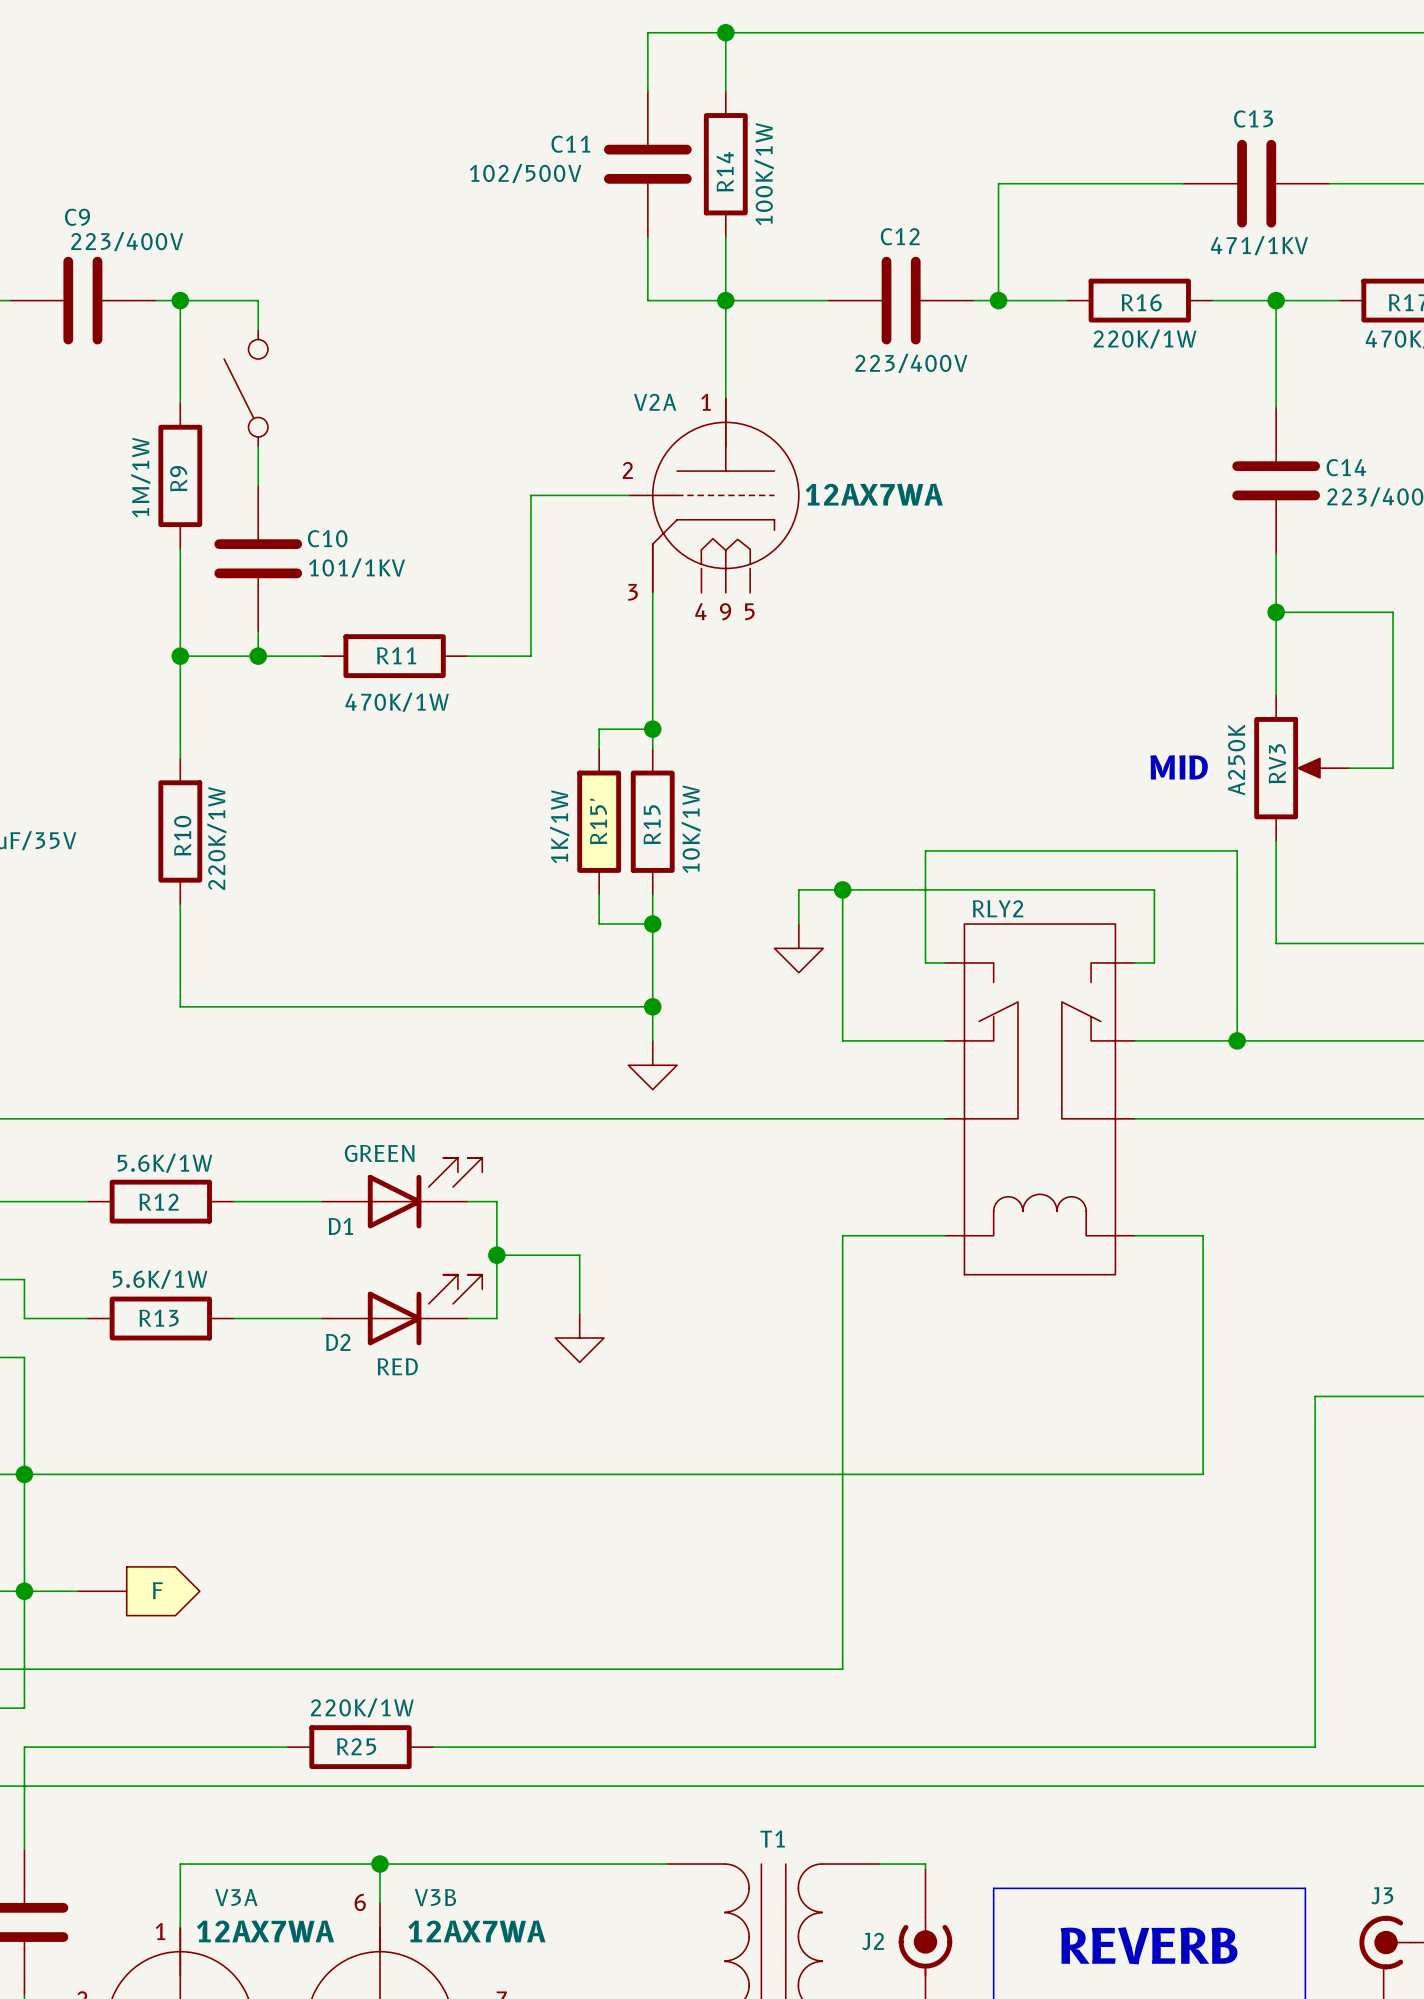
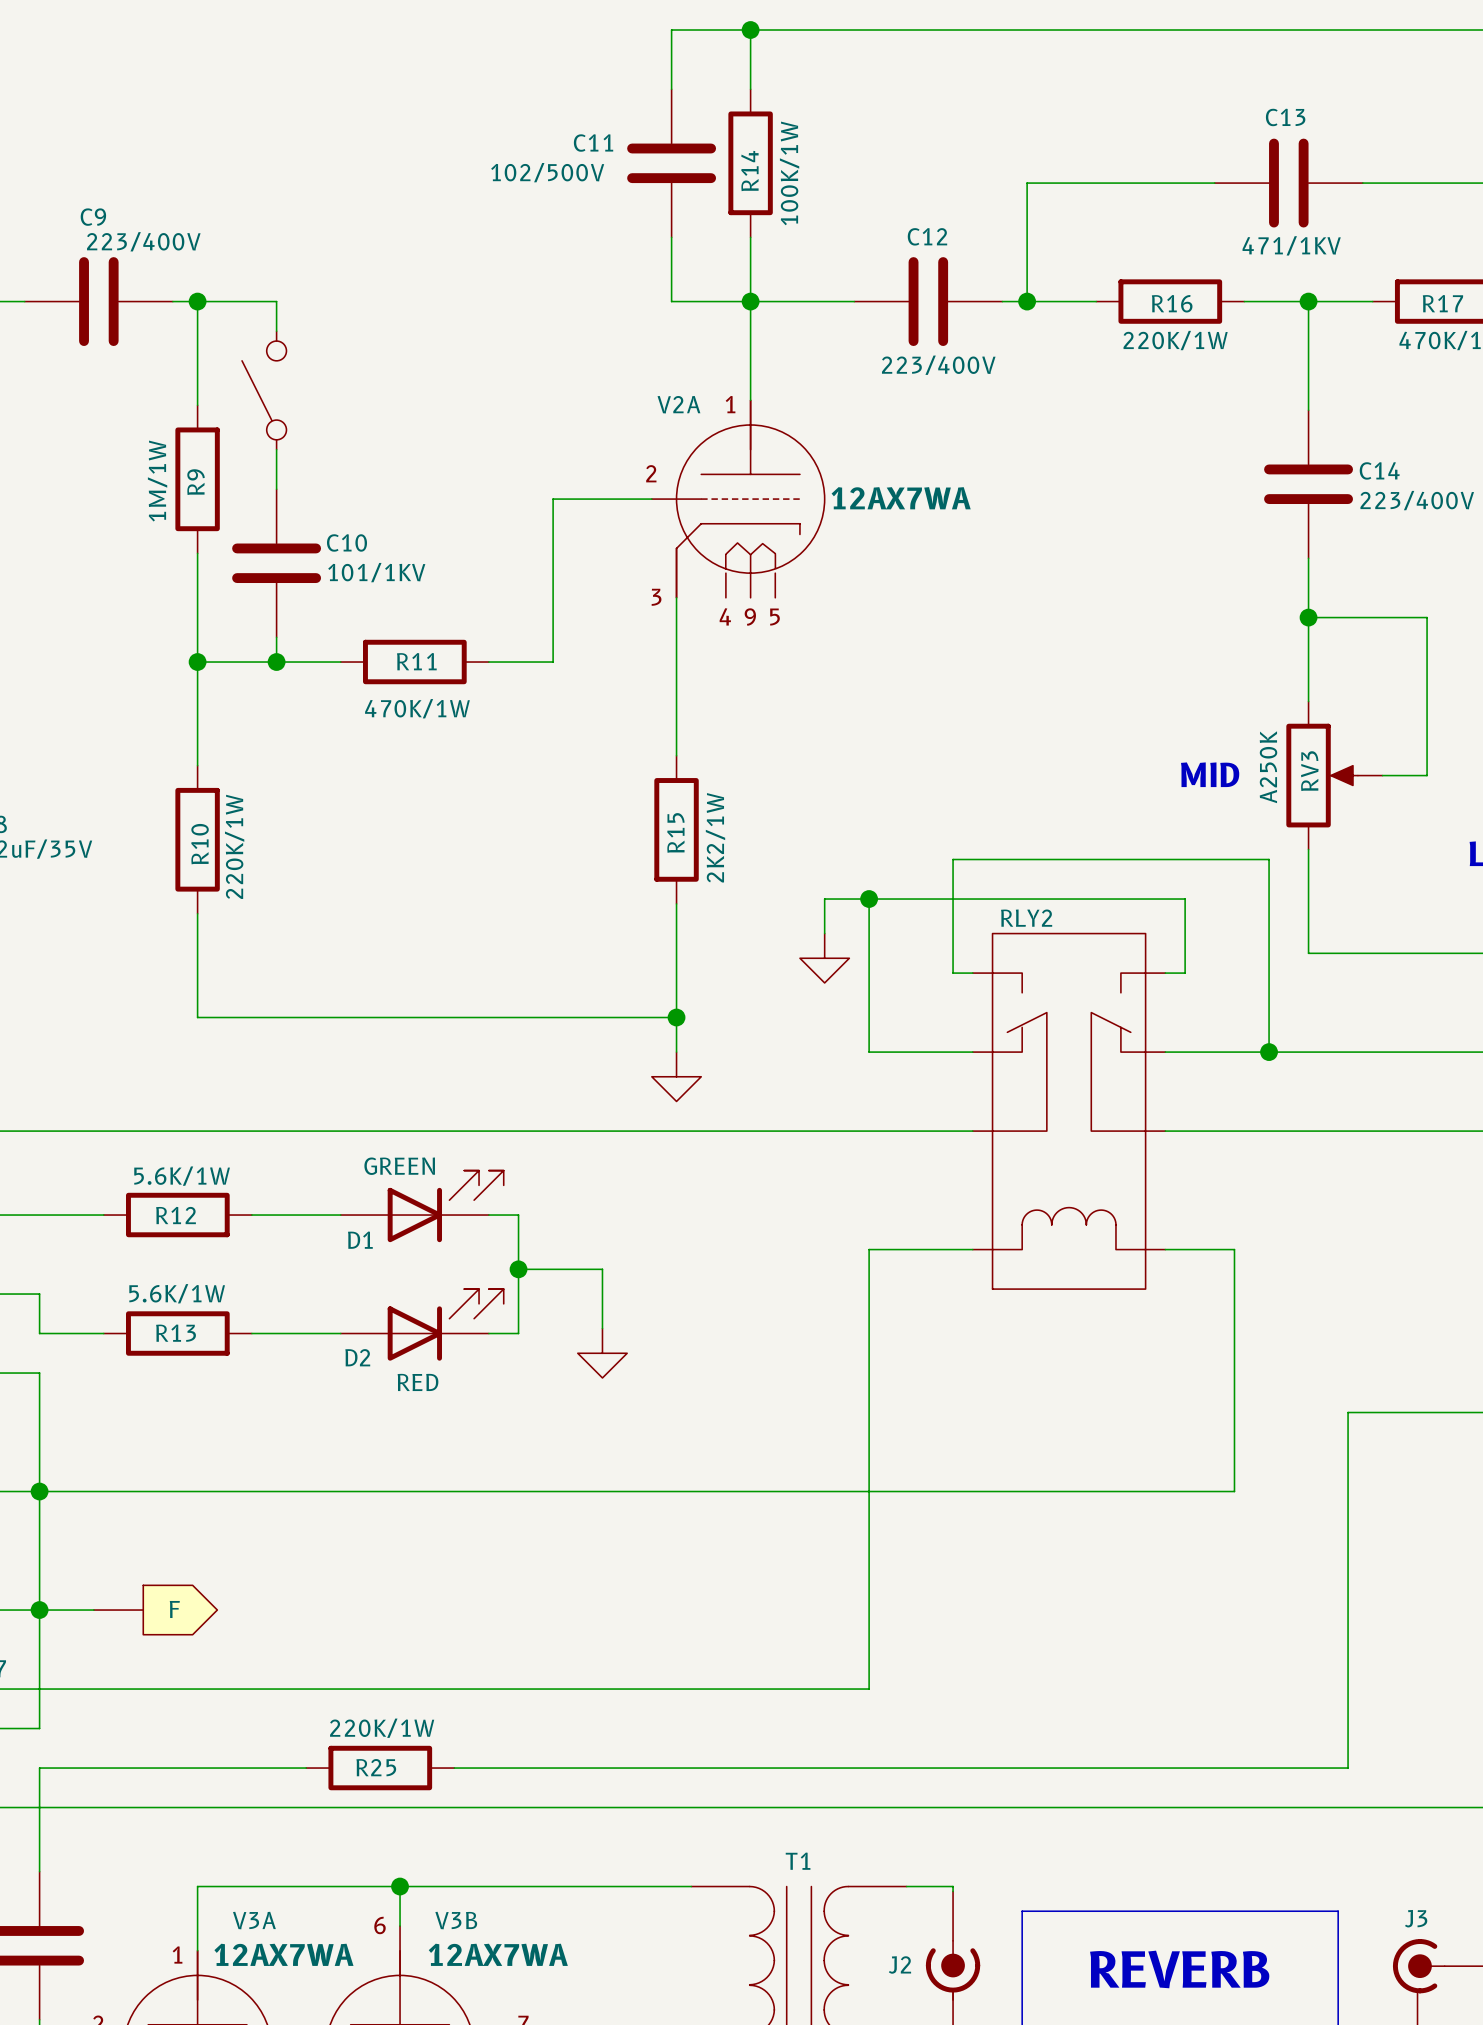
wire: (652, 729) (599, 729) (599, 748) -> none
junction: (652, 729) -> none
R15': 1K/1W (599, 821) -> none
R15 value: 10K/1W (691, 829) -> 2K2/1W (715, 837)
wire: (599, 894) (599, 924) (652, 924) -> none
junction: (652, 924) -> none

